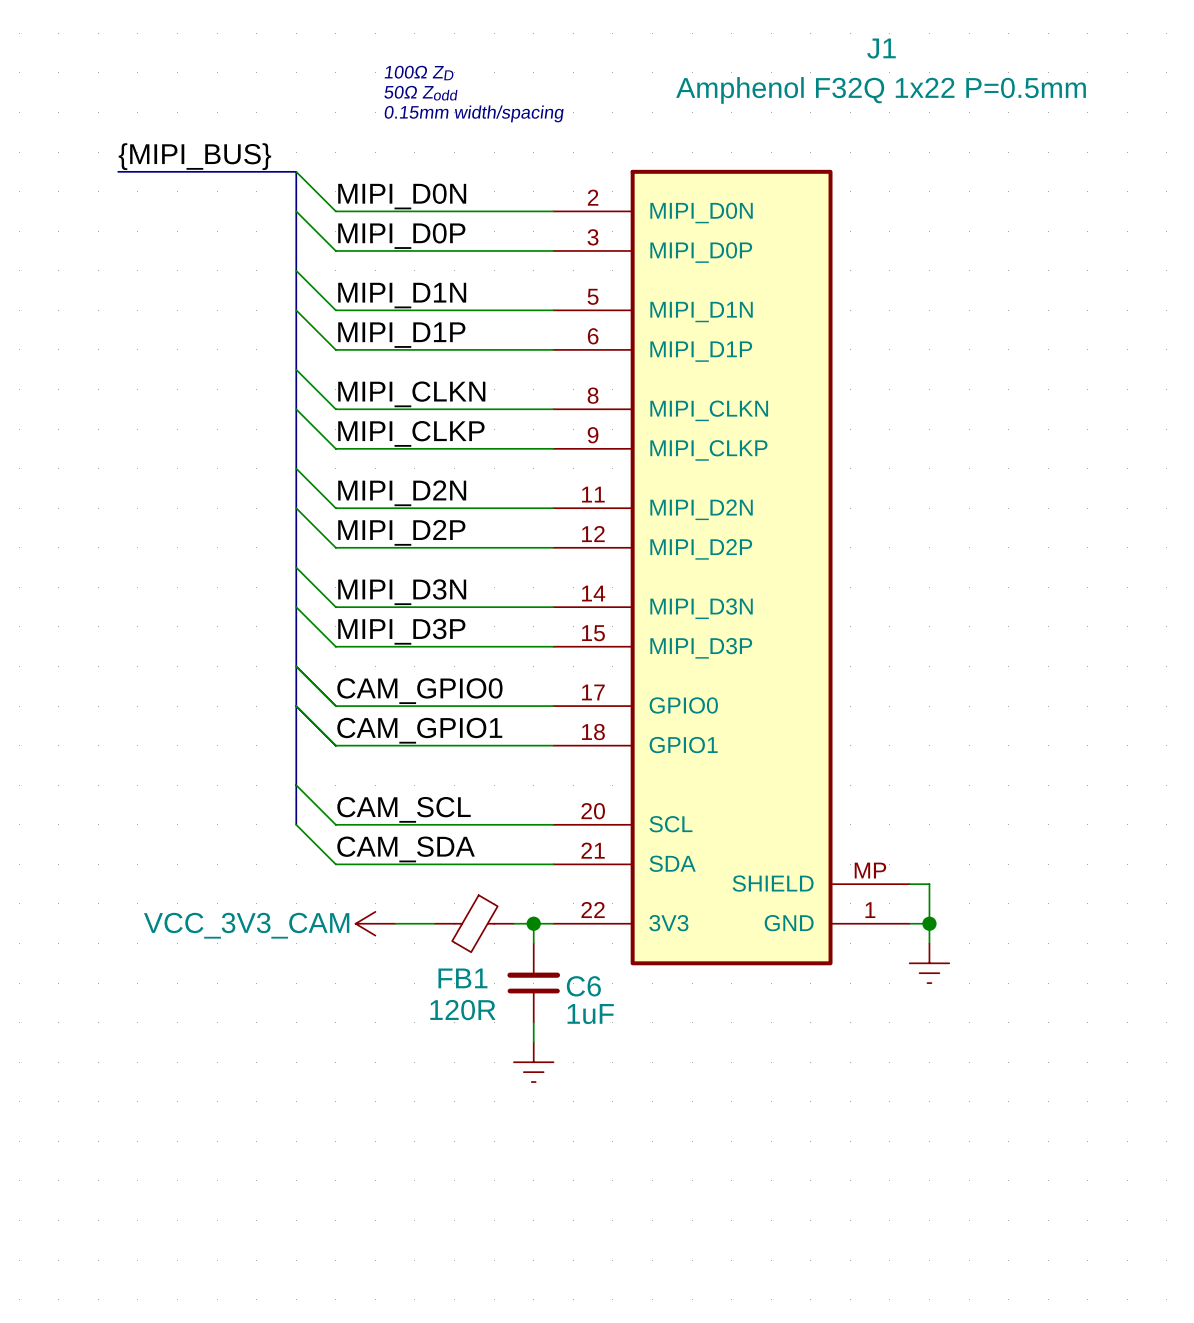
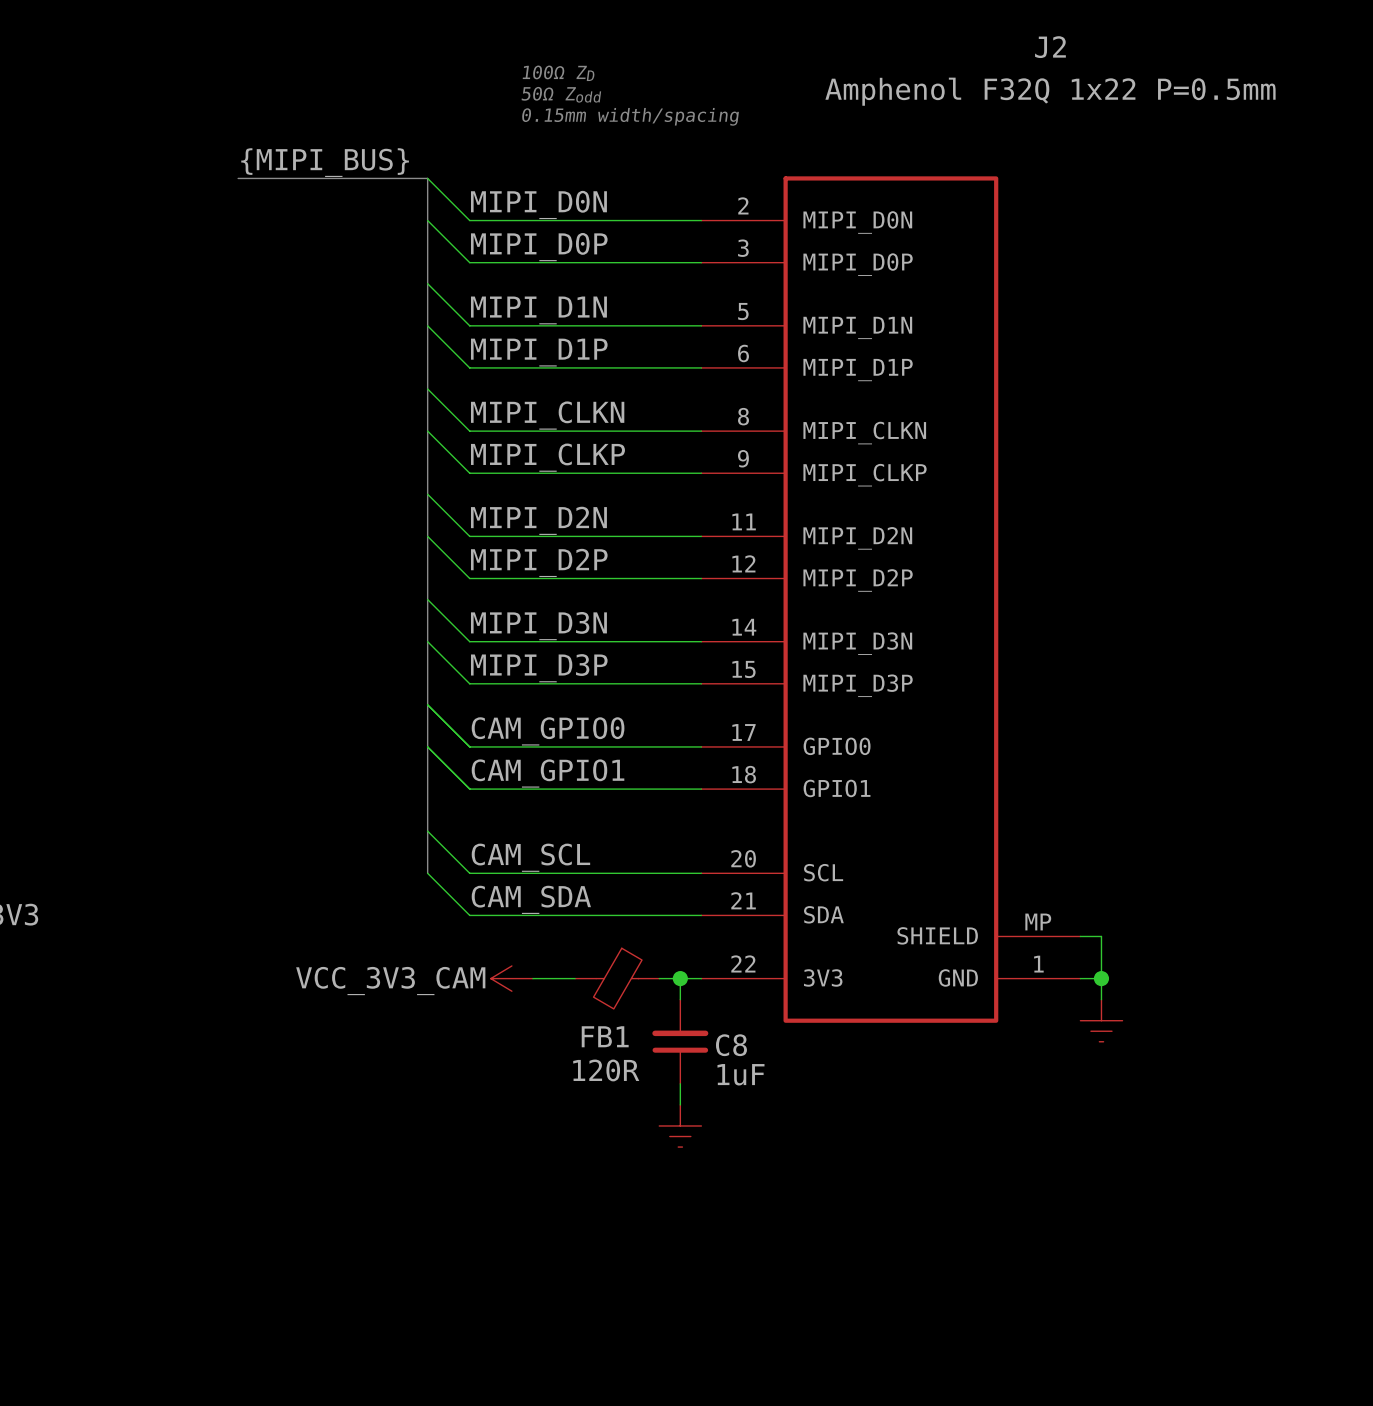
J1 name: J1 (881, 48) -> J2 (1050, 47)
C6 name: C6 (583, 986) -> C8 (731, 1045)

